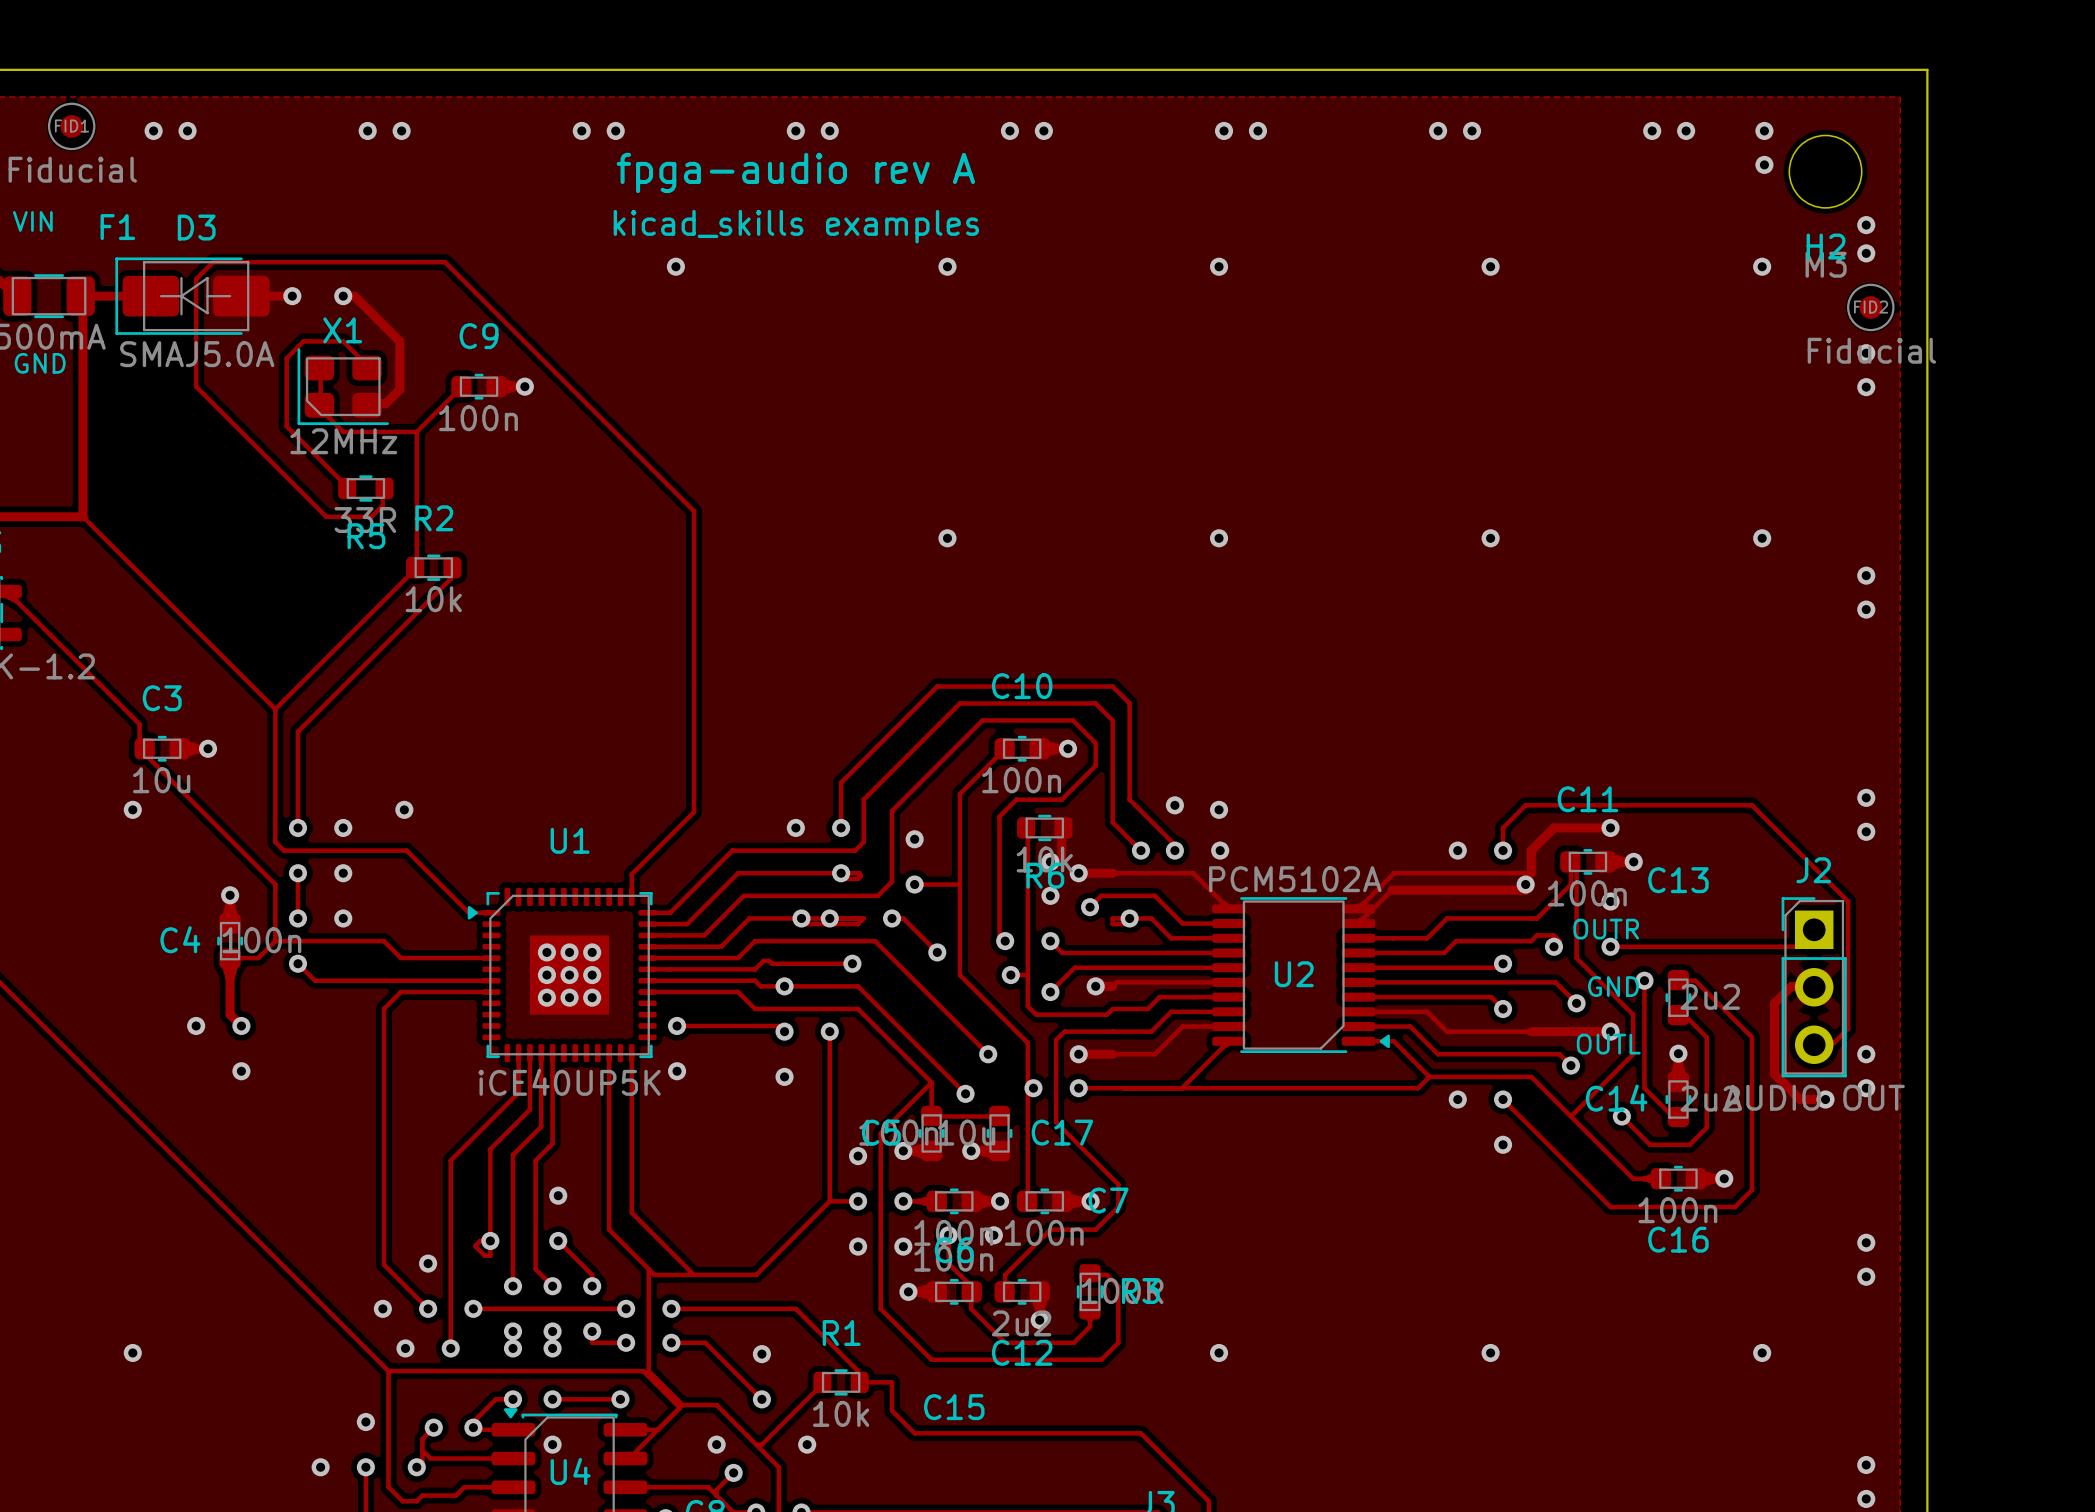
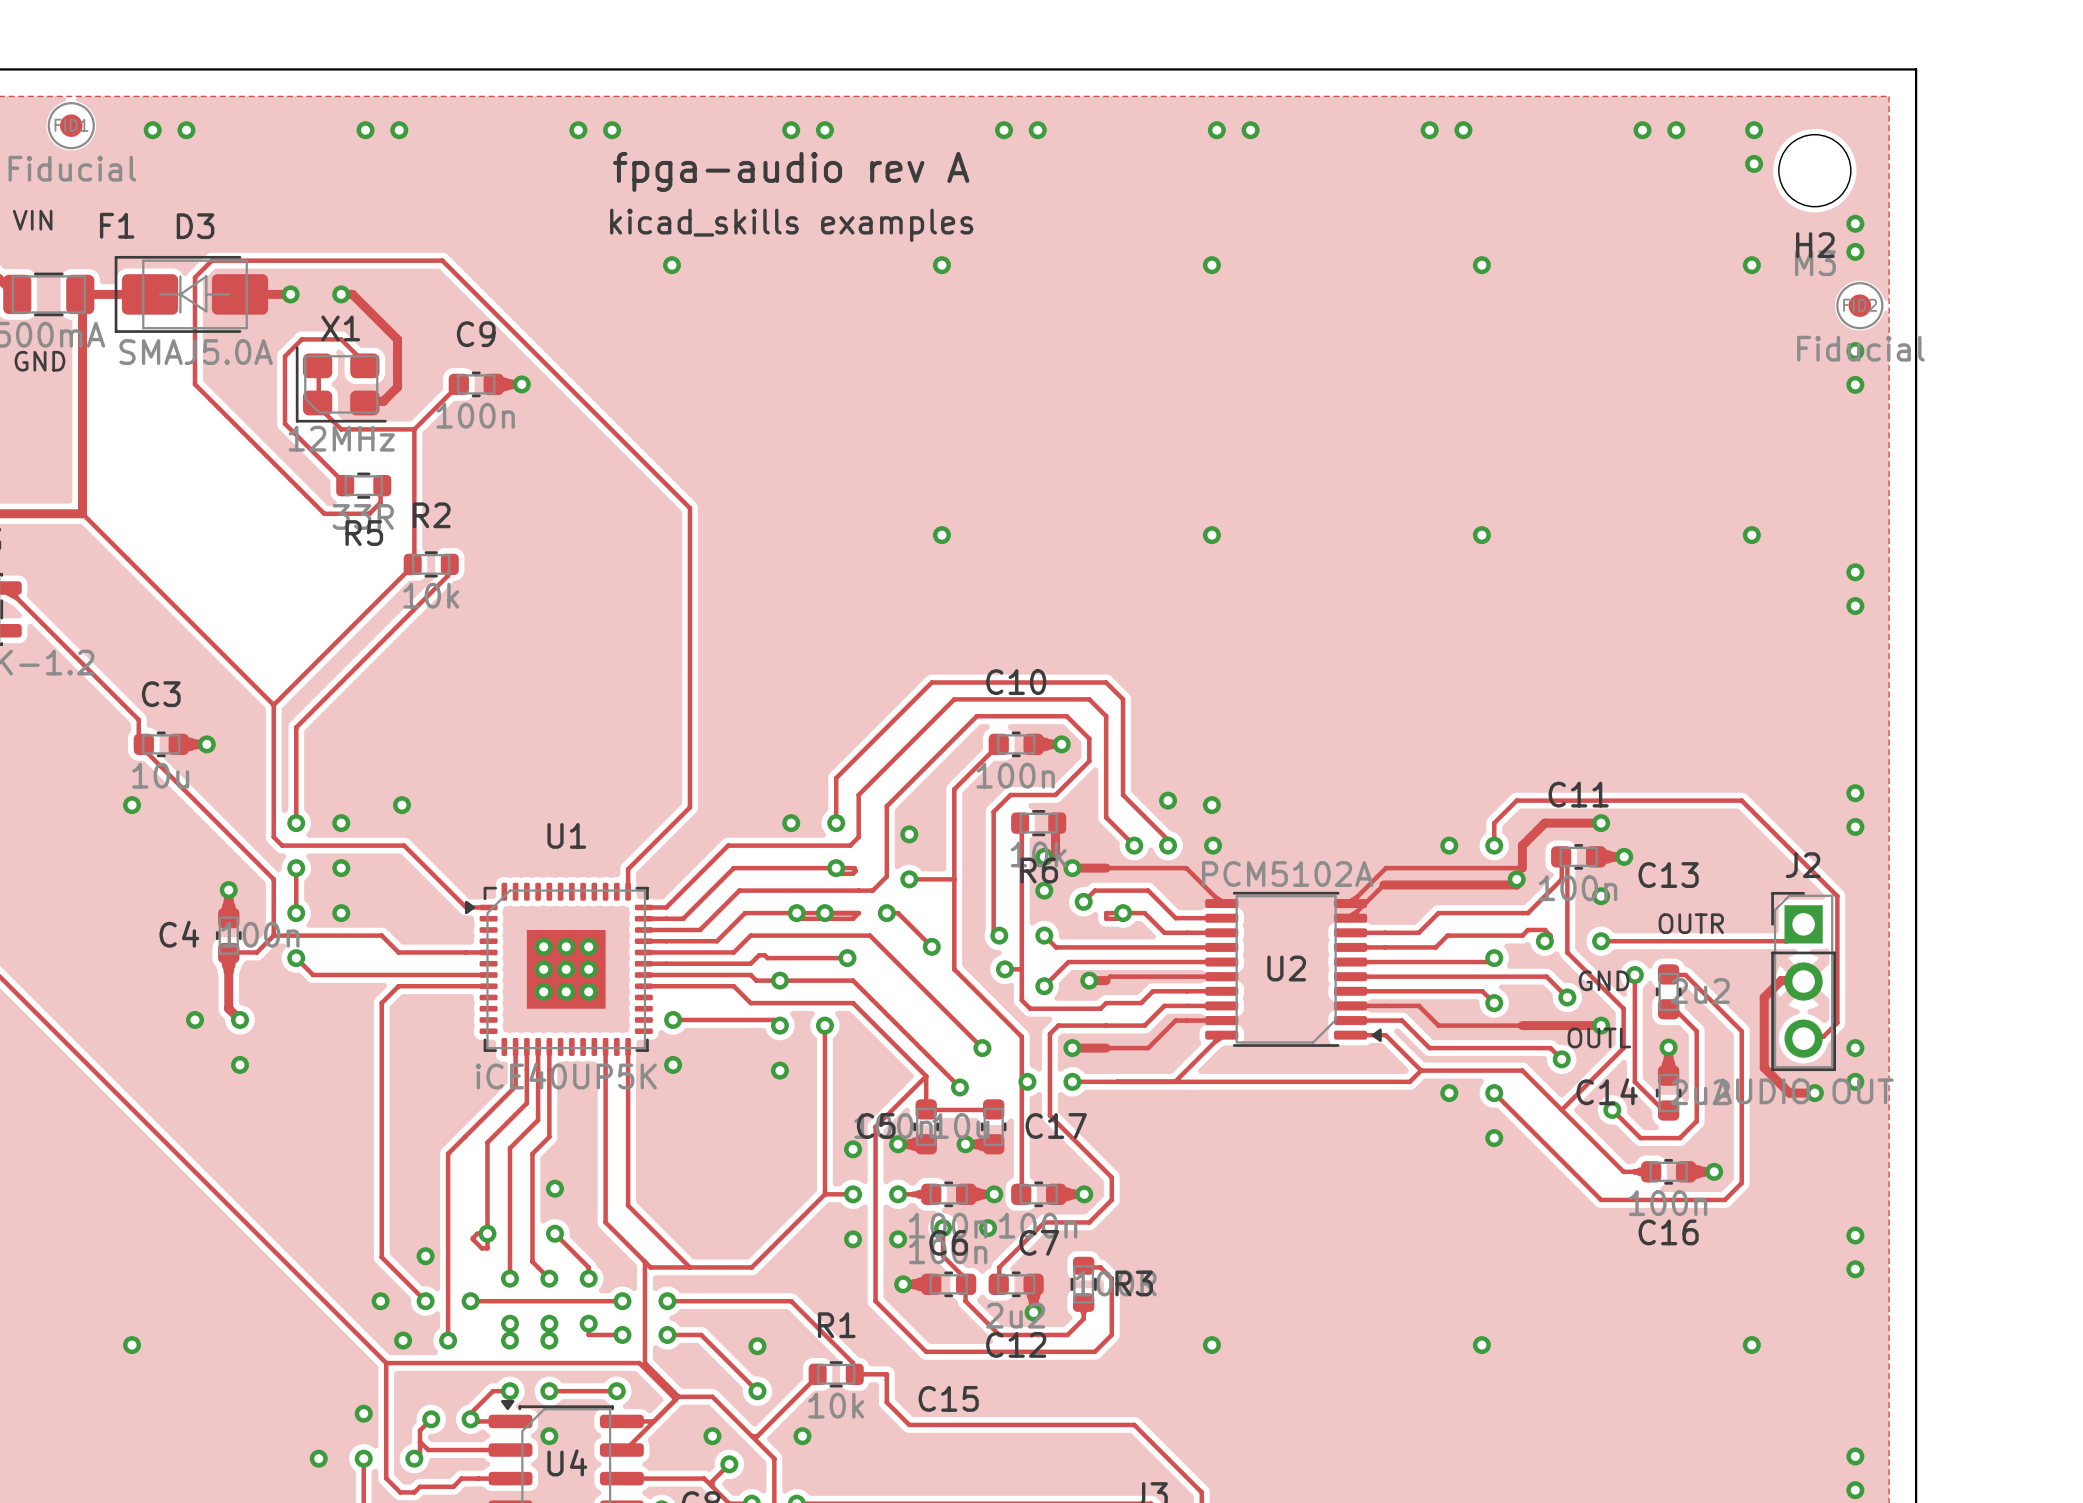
text position: OUTR (1606, 929) -> OUTR (1691, 923)
C7 name position: C7 (1108, 1200) -> C7 (1039, 1242)

